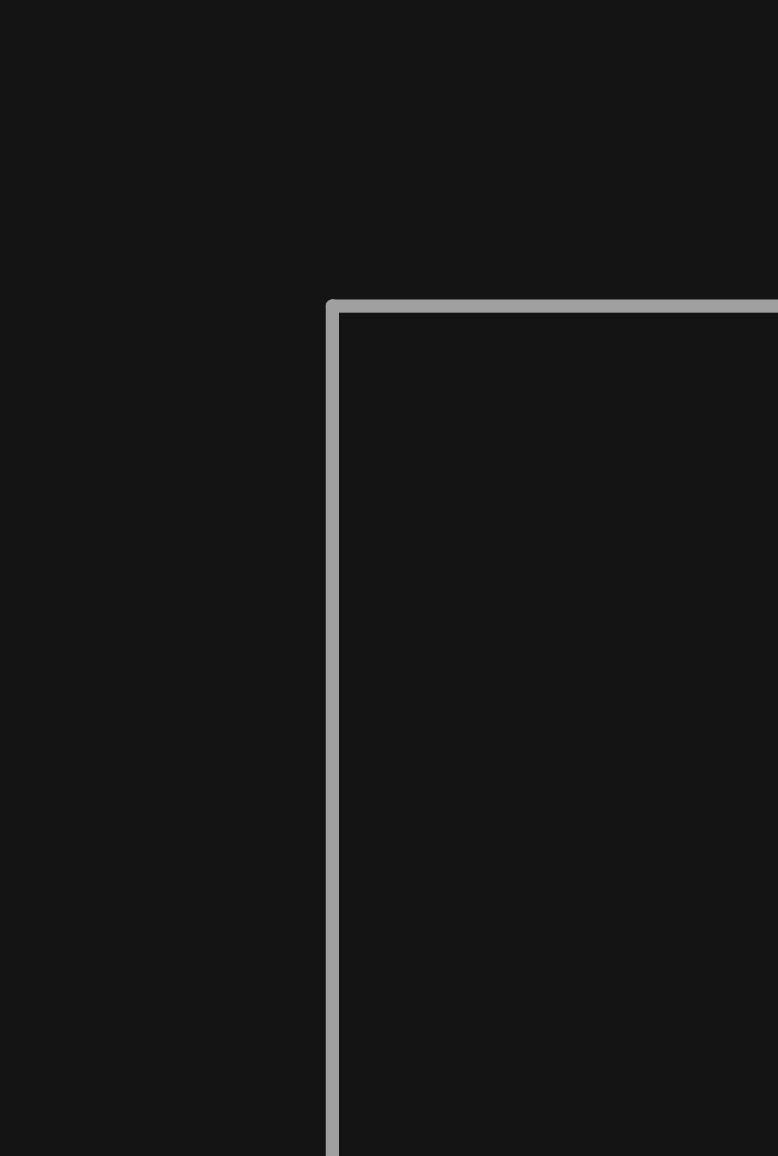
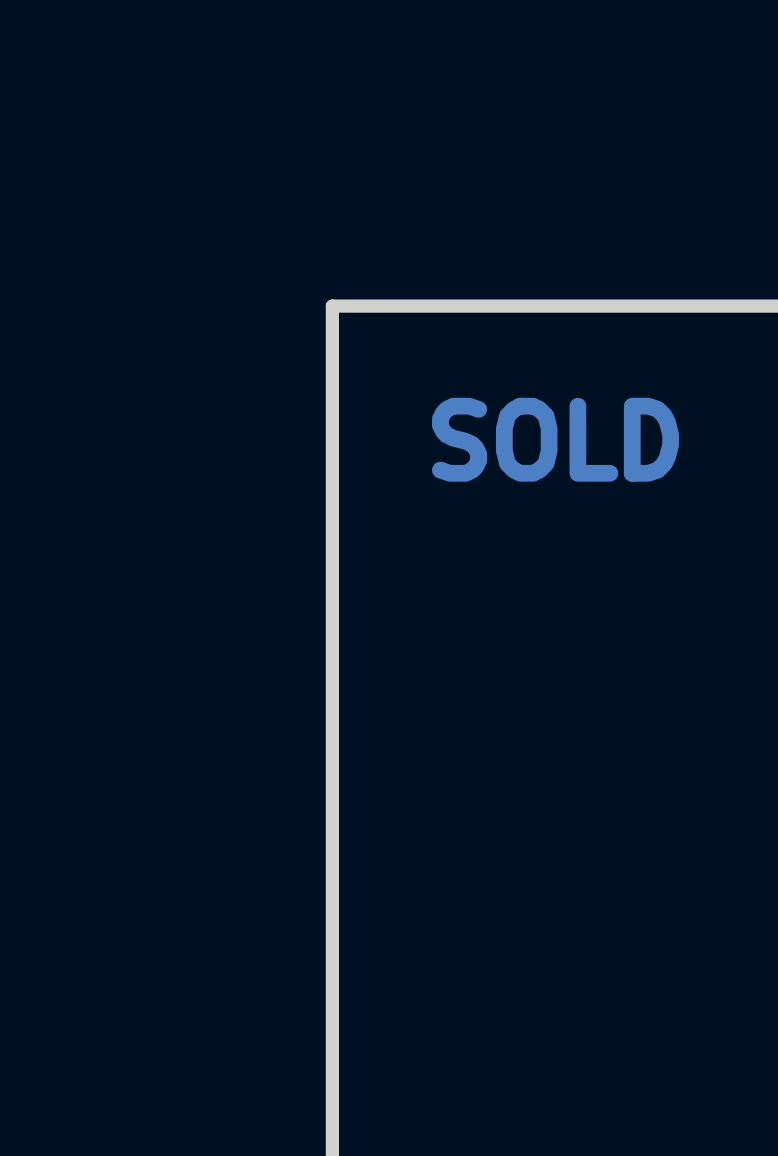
text: none -> SOLD (555, 439)

